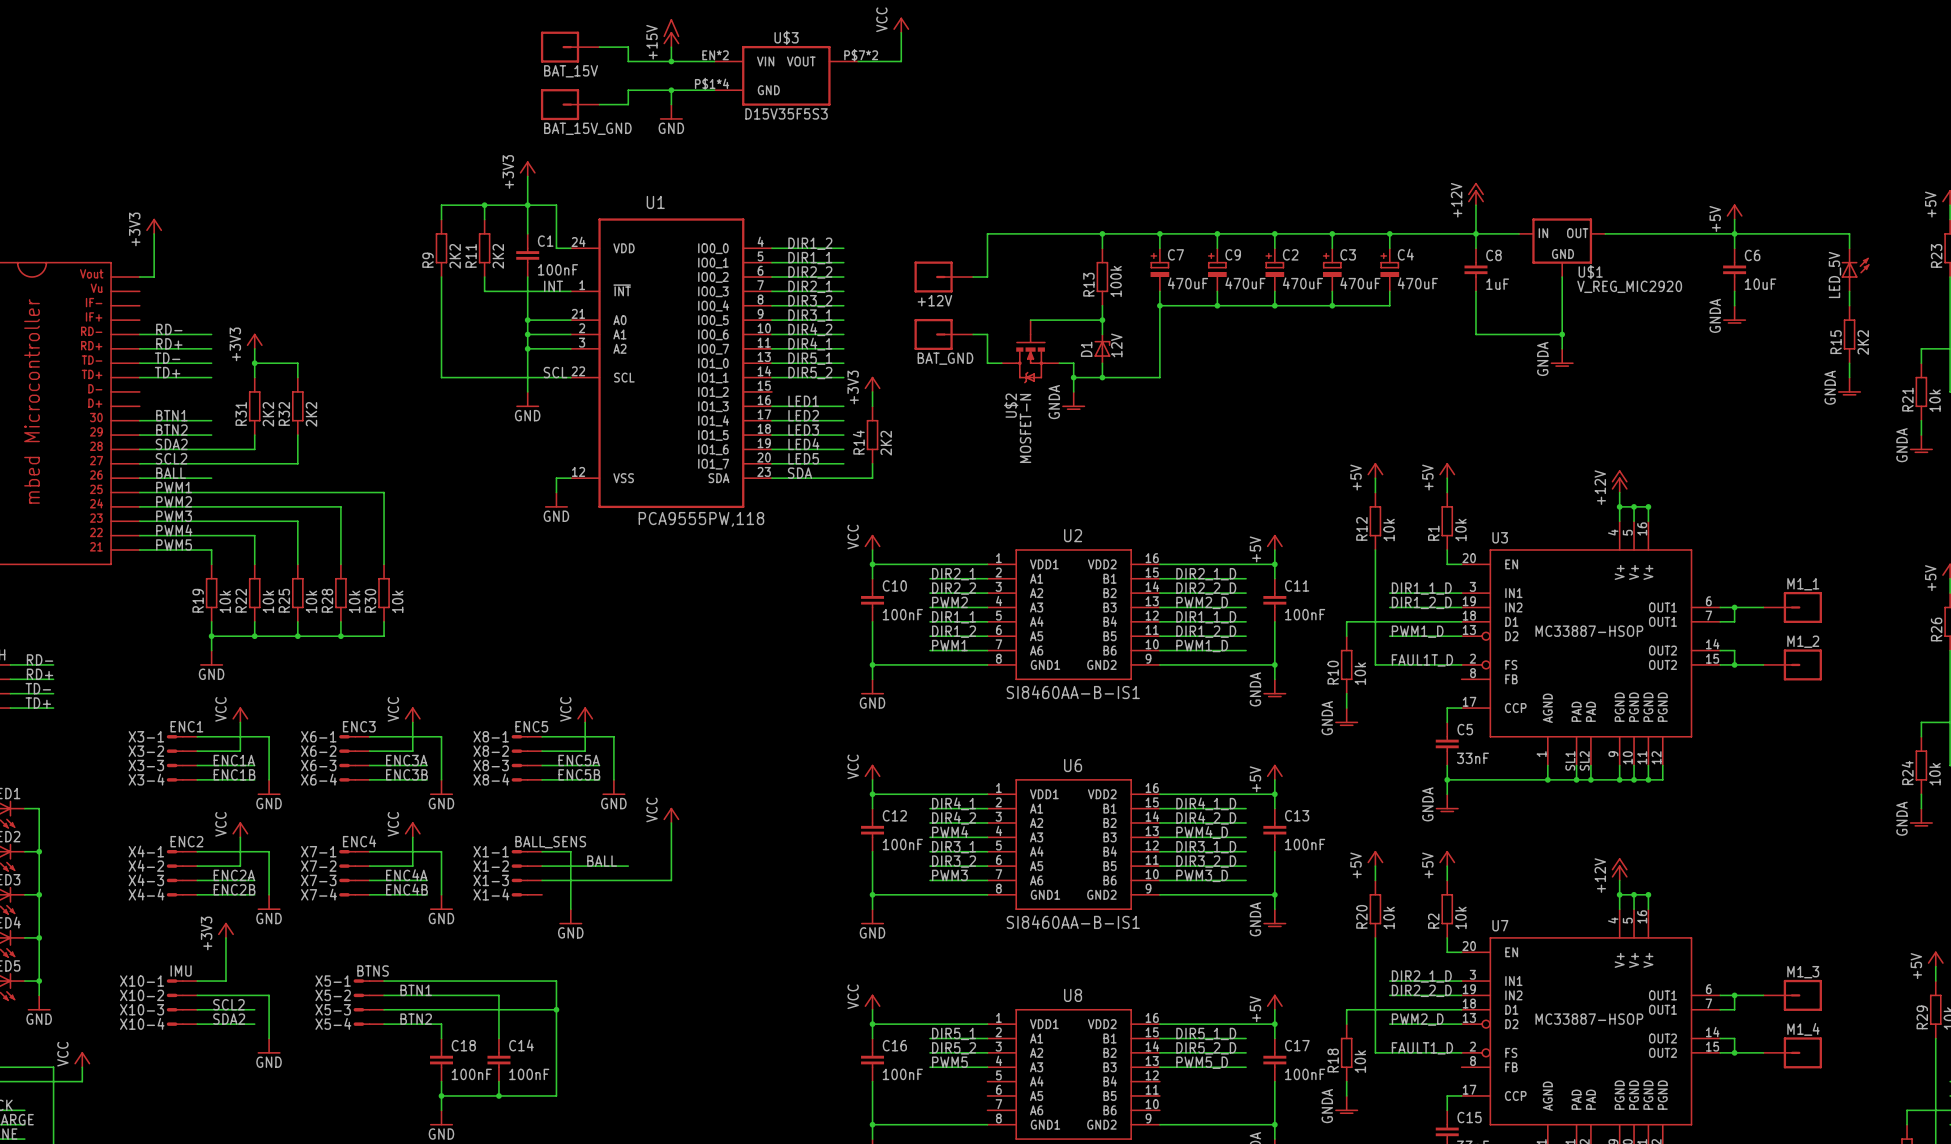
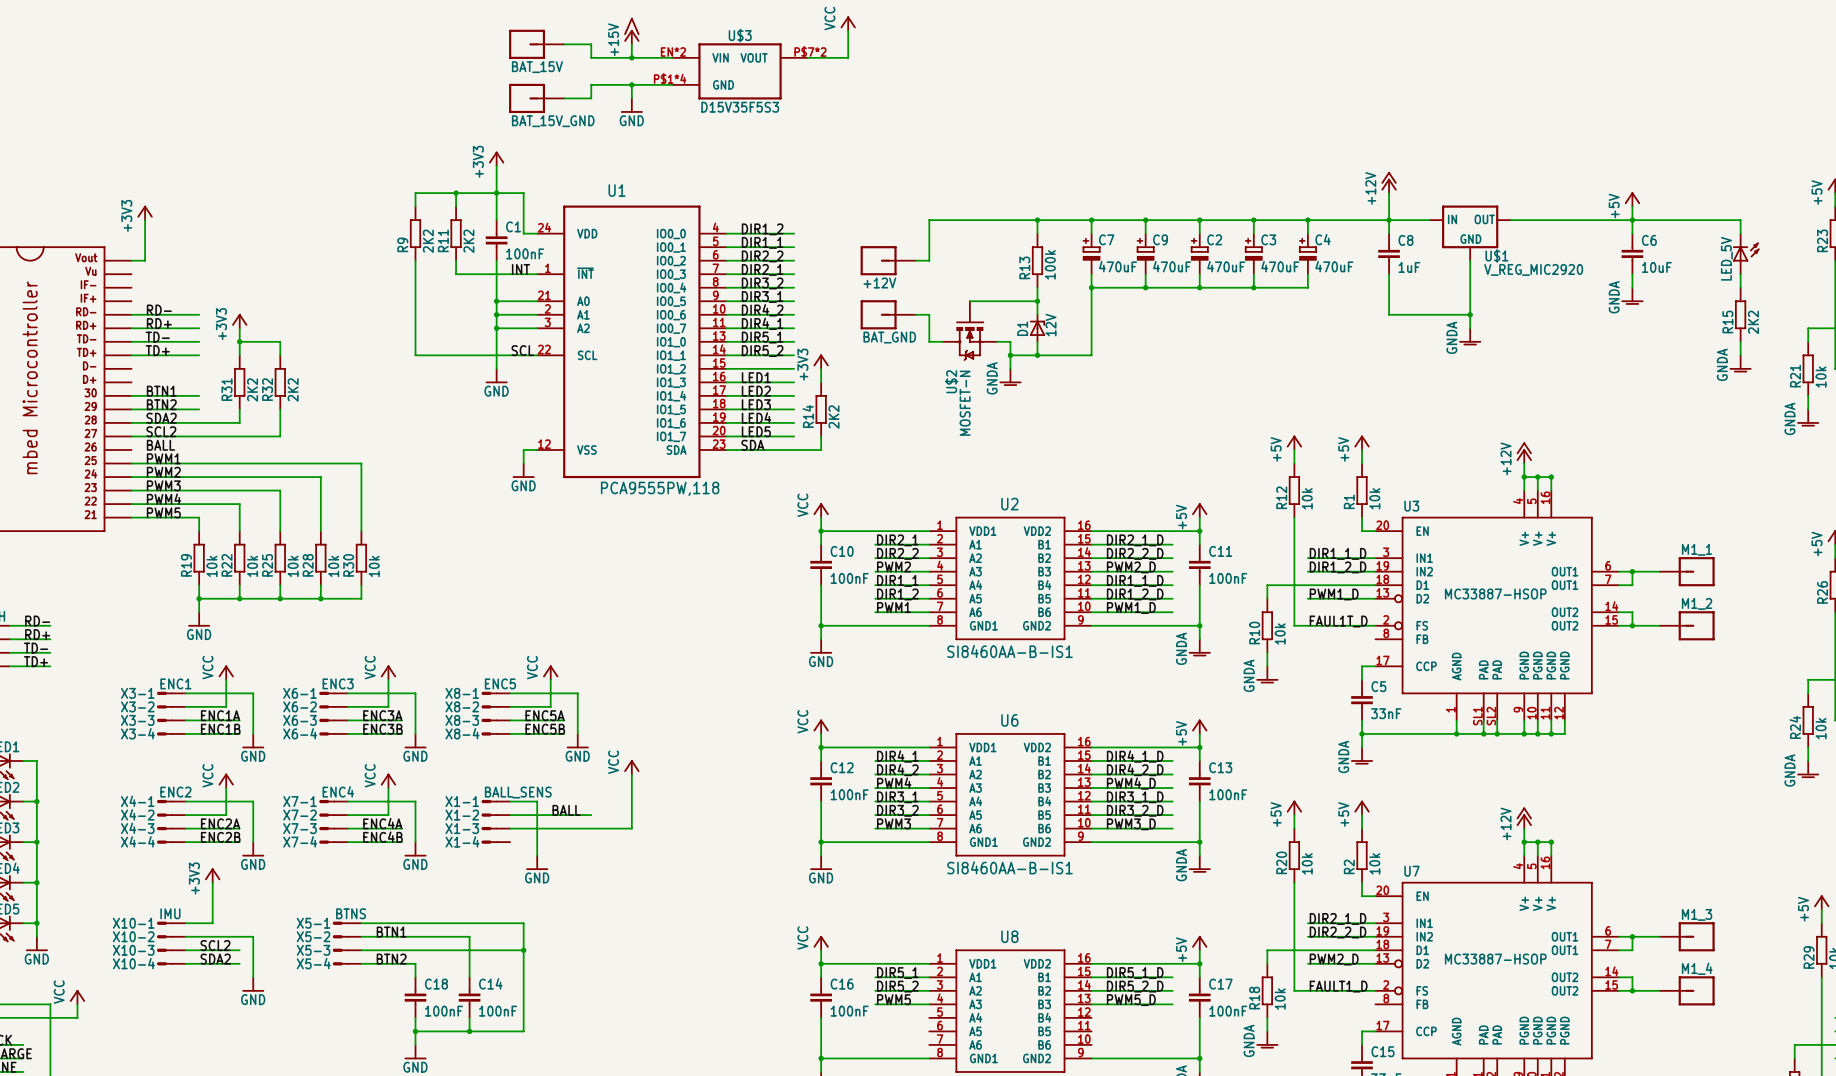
wire: none -> (726, 368) (794, 368)
wire: (139, 478) (211, 478) -> none

